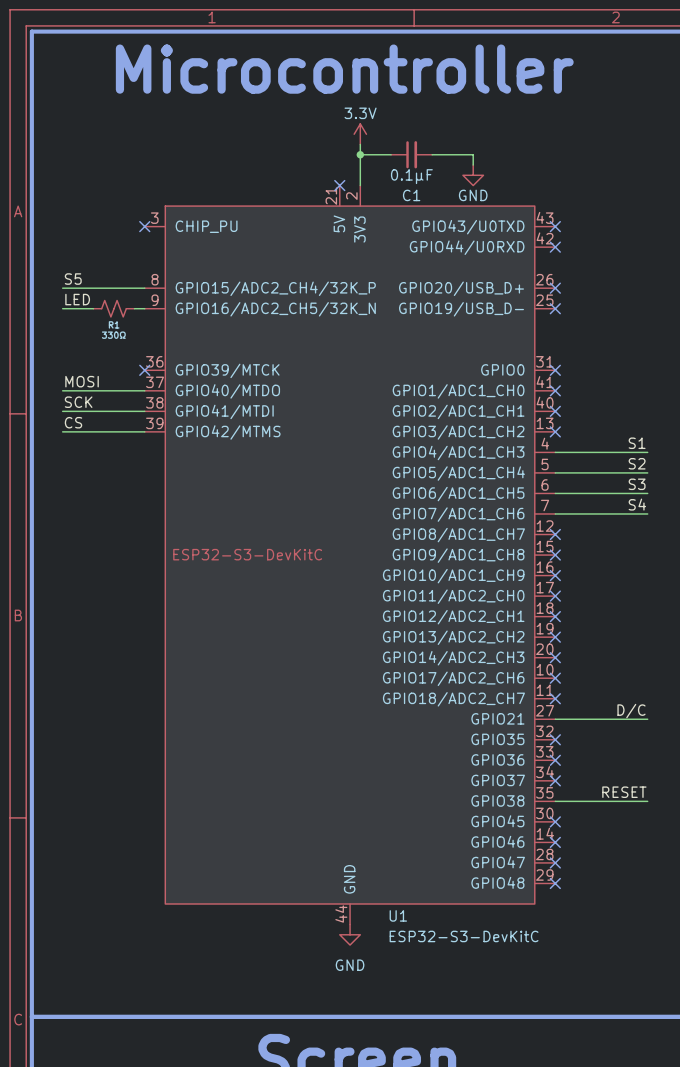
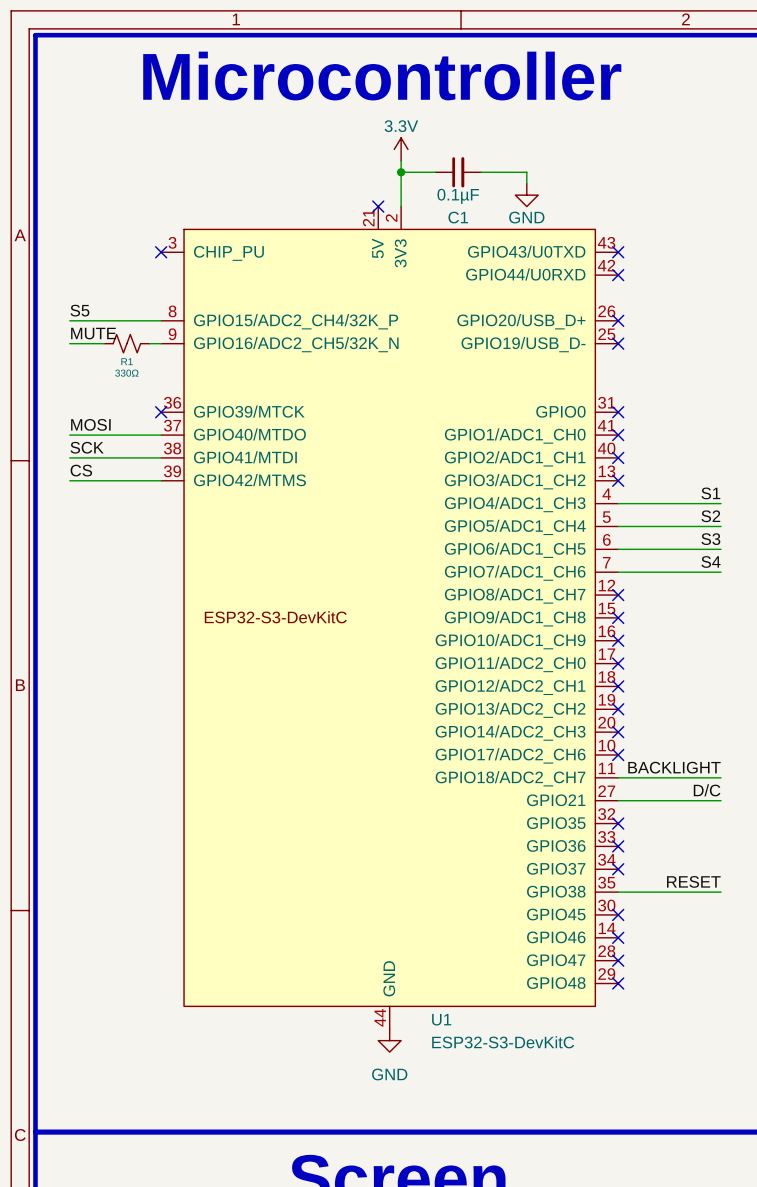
label: LED (77, 299) -> MUTE (93, 333)
label: none -> BACKLIGHT (674, 767)
wire: none -> (618, 777) (721, 777)
no-connect mark: (555, 698) -> none

